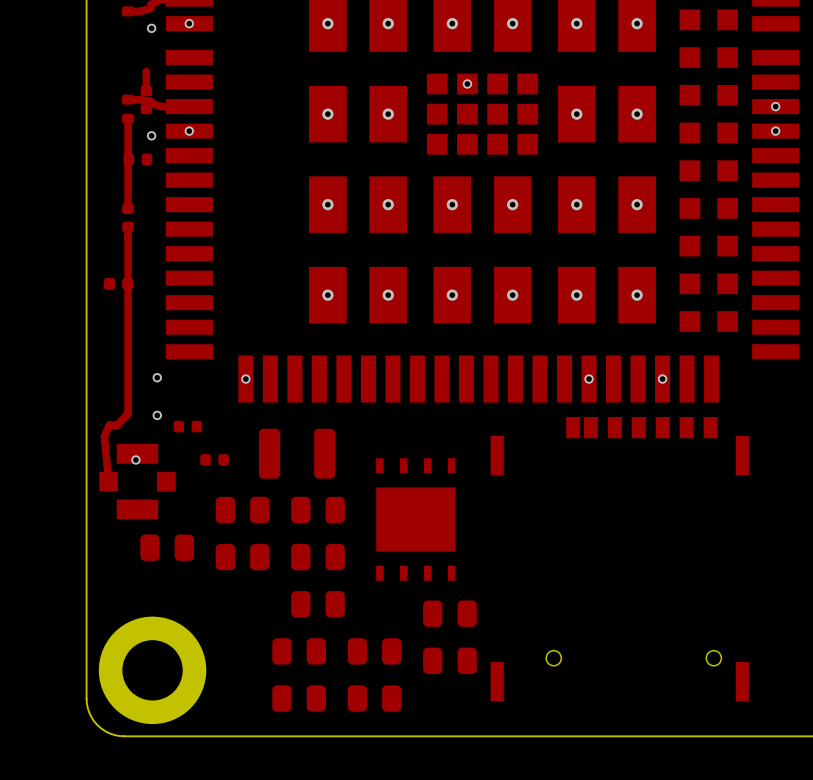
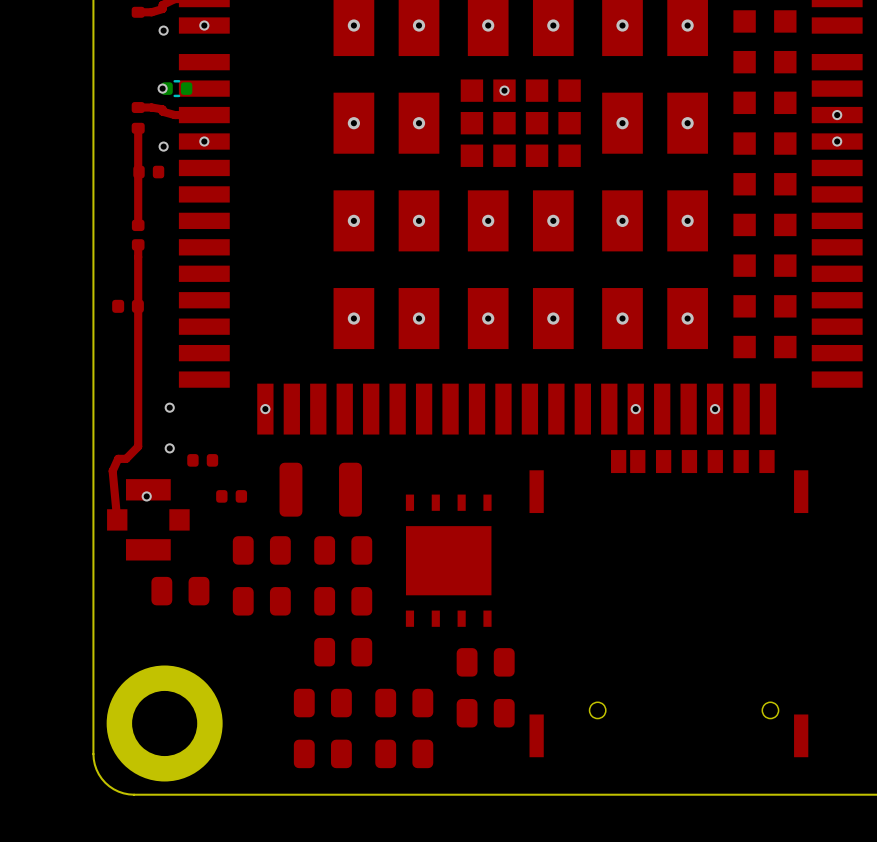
top track: (146, 71) (146, 90) -> none
via: none -> (162, 88)
part side: top (146, 100) -> bottom (176, 88)

